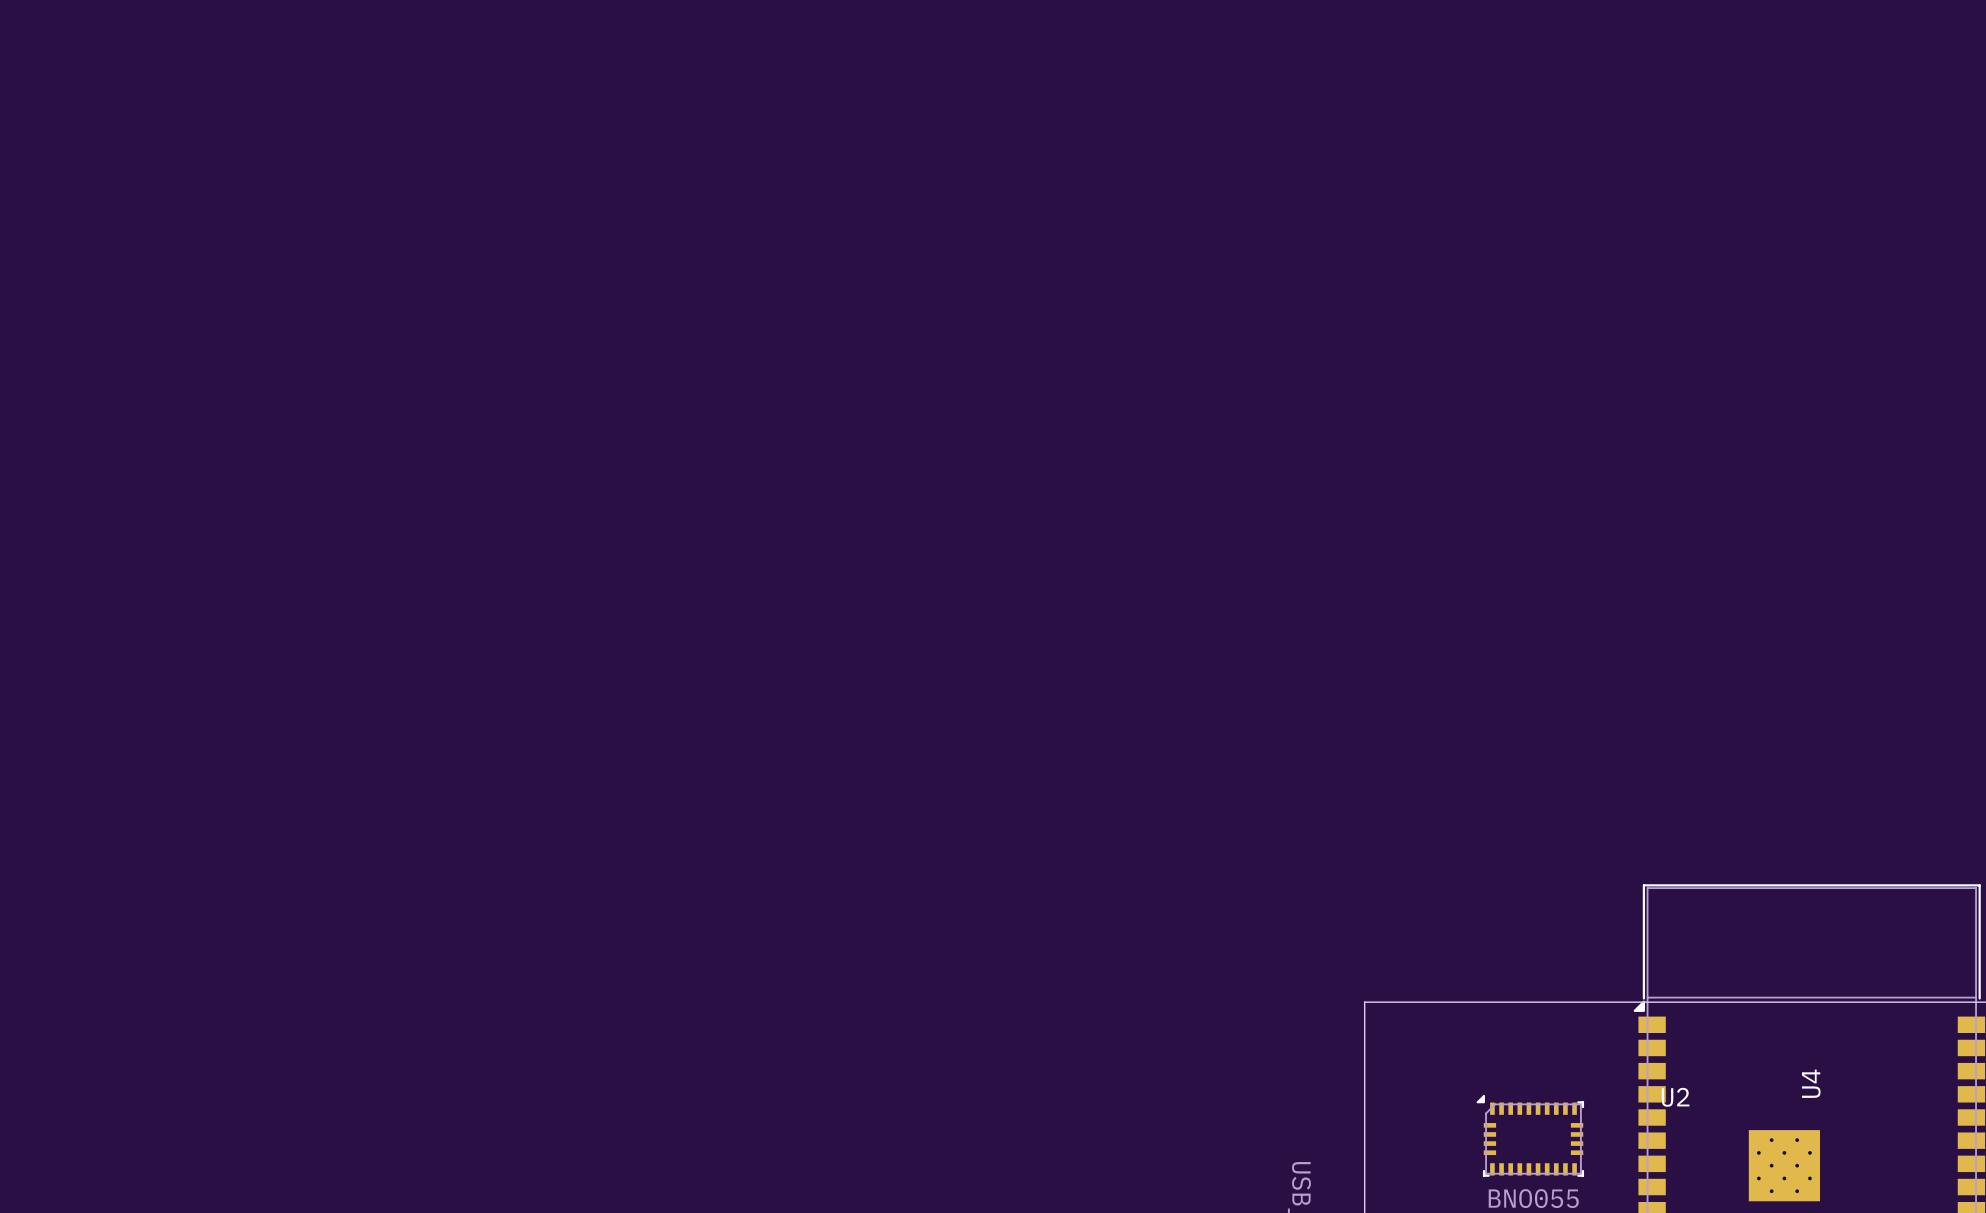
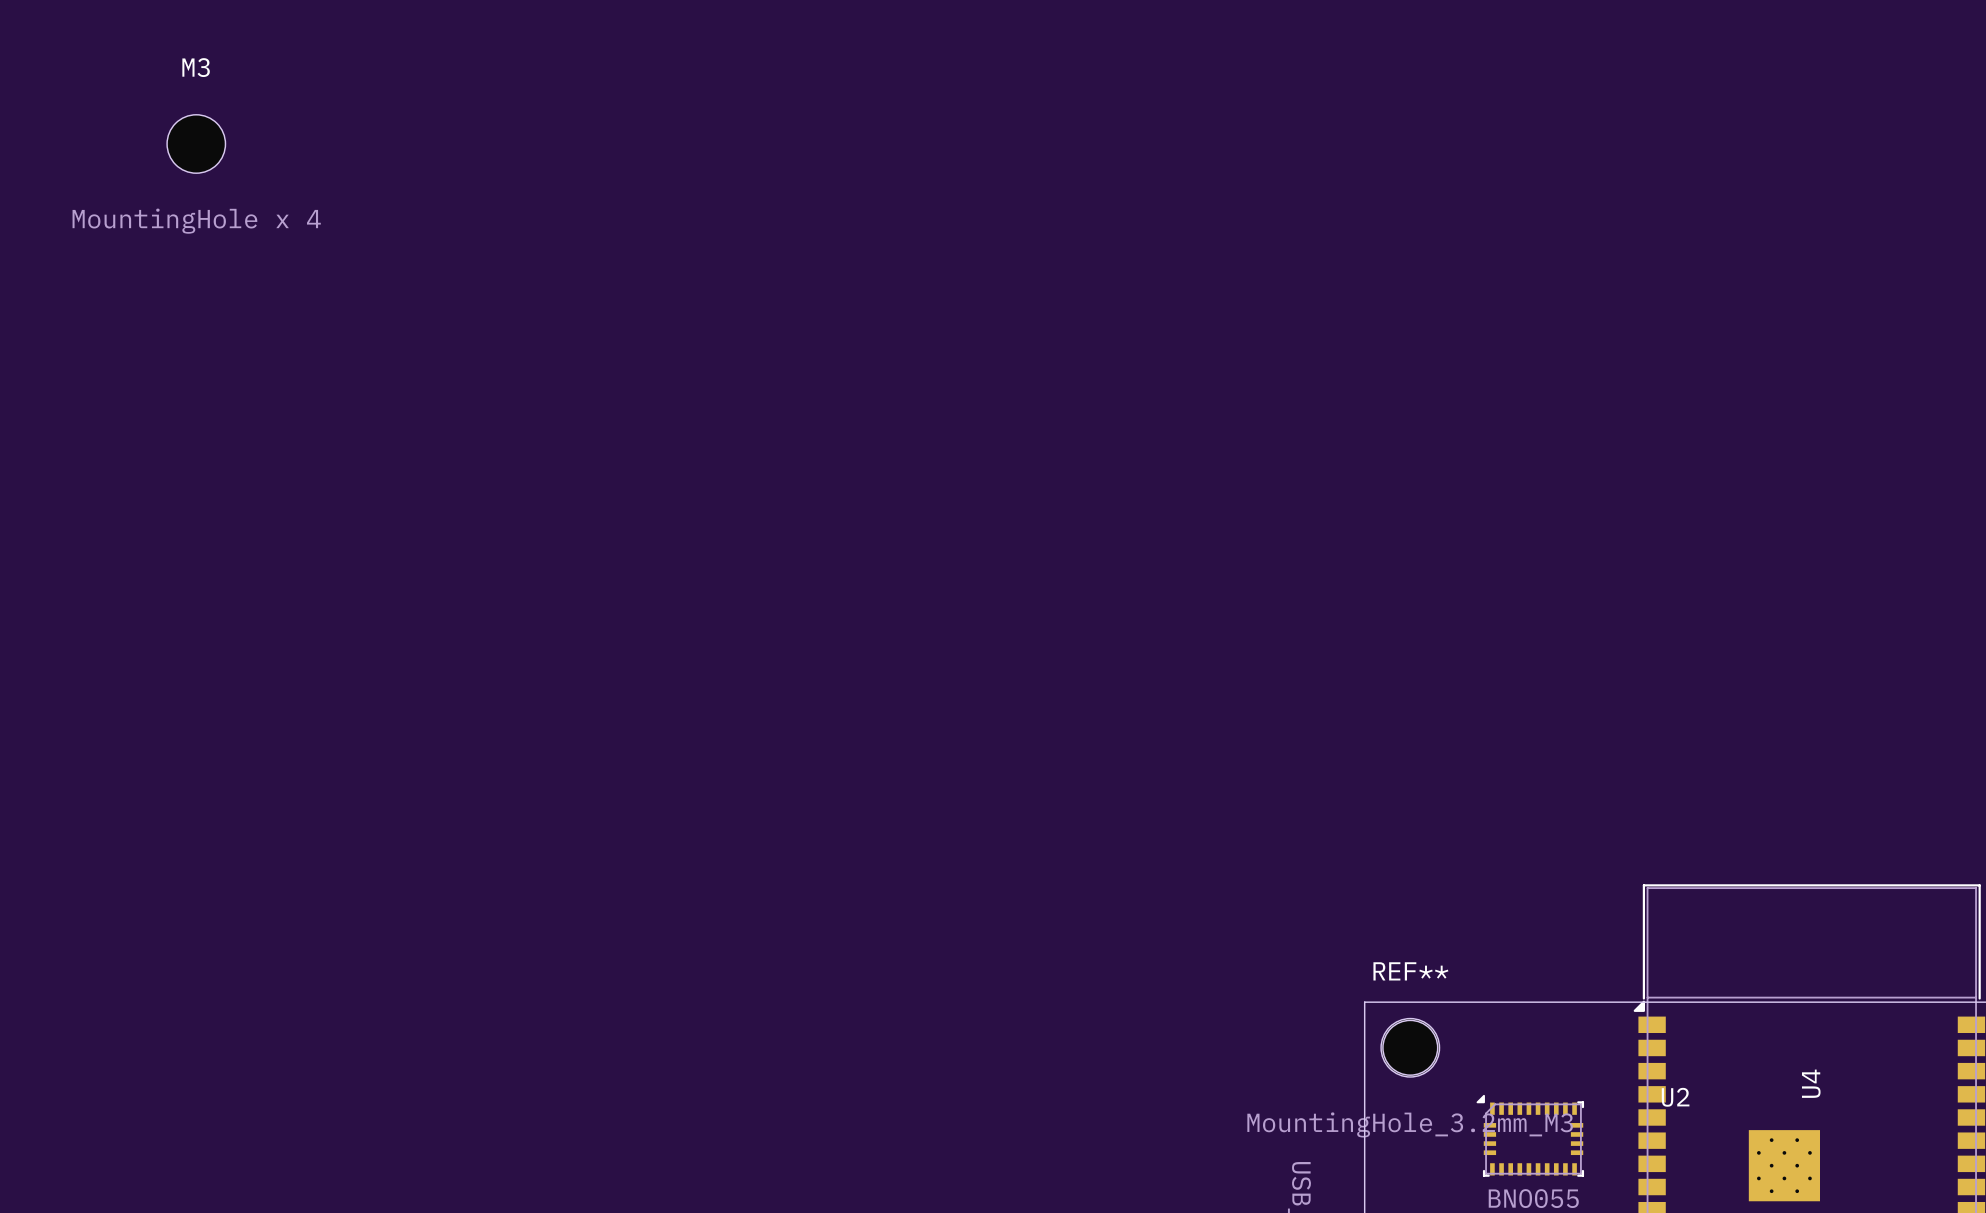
M3: none -> MountingHole x 4 (196, 143)
round board edge: none -> [1382, 1019, 1439, 1076]
REF**: none -> MountingHole_3.2mm_M3 (1410, 1047)

